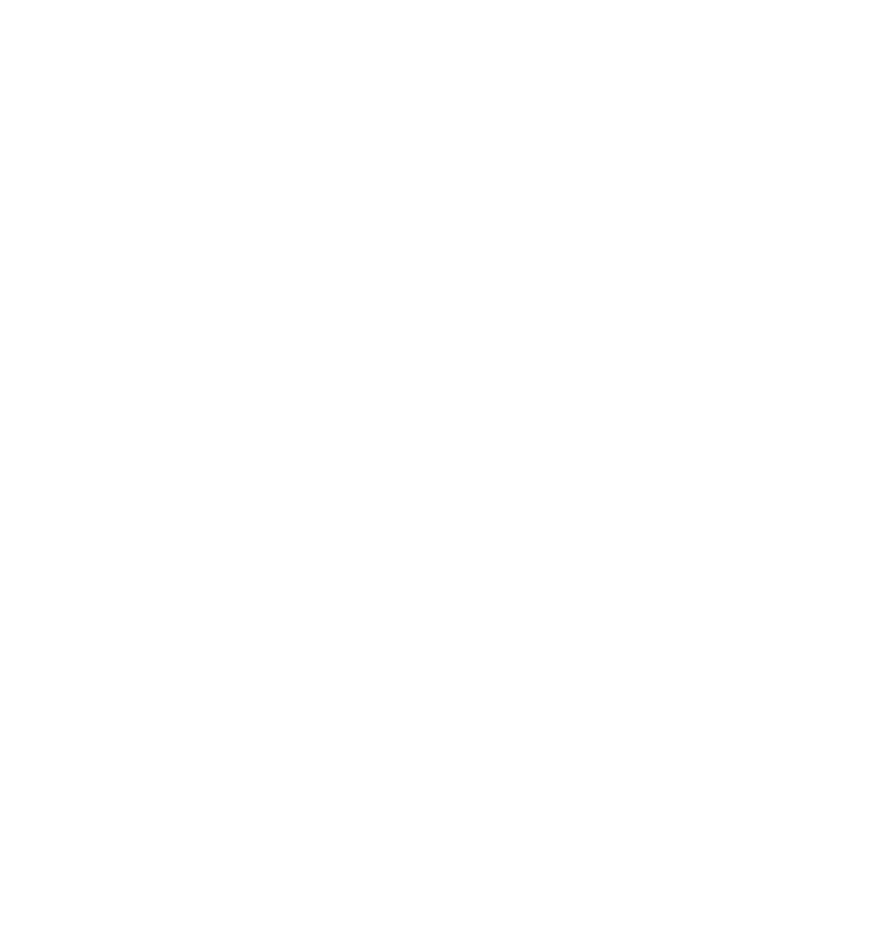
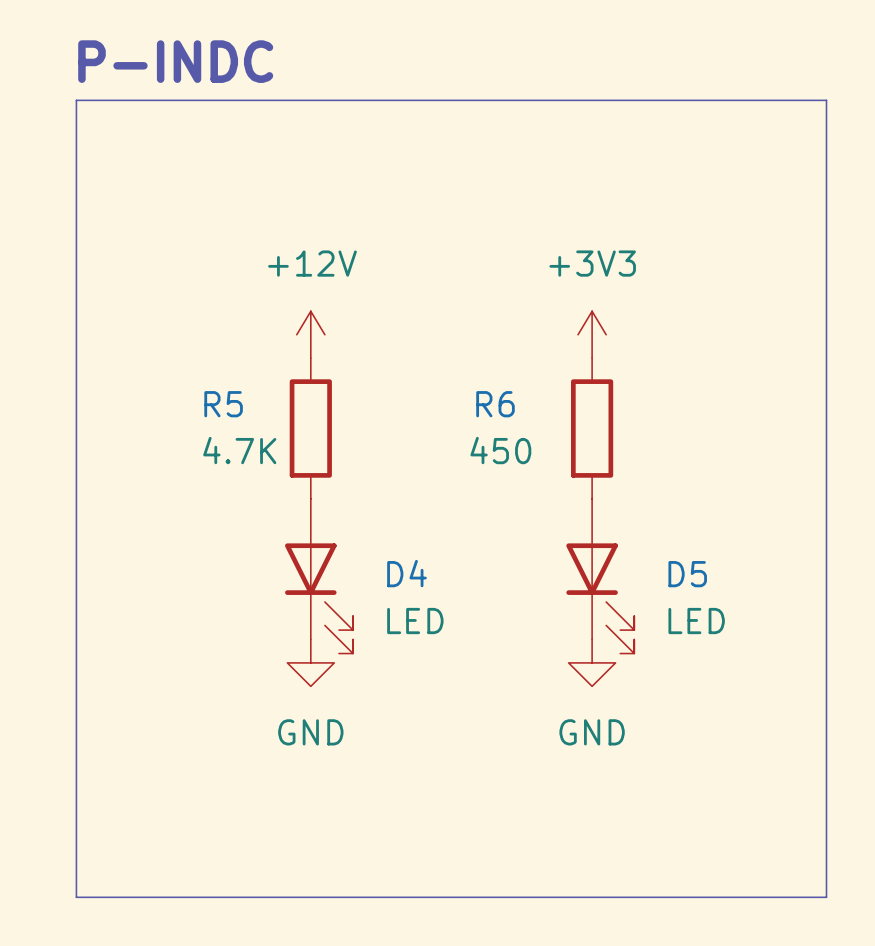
text: none -> P-INDC (175, 61)
line: none -> (76, 100) (826, 100) (826, 897) (76, 897) (76, 100)
power symbol: none -> +12V (310, 334)
power symbol: none -> +3V3 (592, 334)
R5: none -> 4.7K (310, 428)
R6: none -> 450 (592, 428)
D4: none -> LED (319, 576)
D5: none -> LED (600, 576)
power symbol: none -> GND (310, 662)
power symbol: none -> GND (592, 662)

